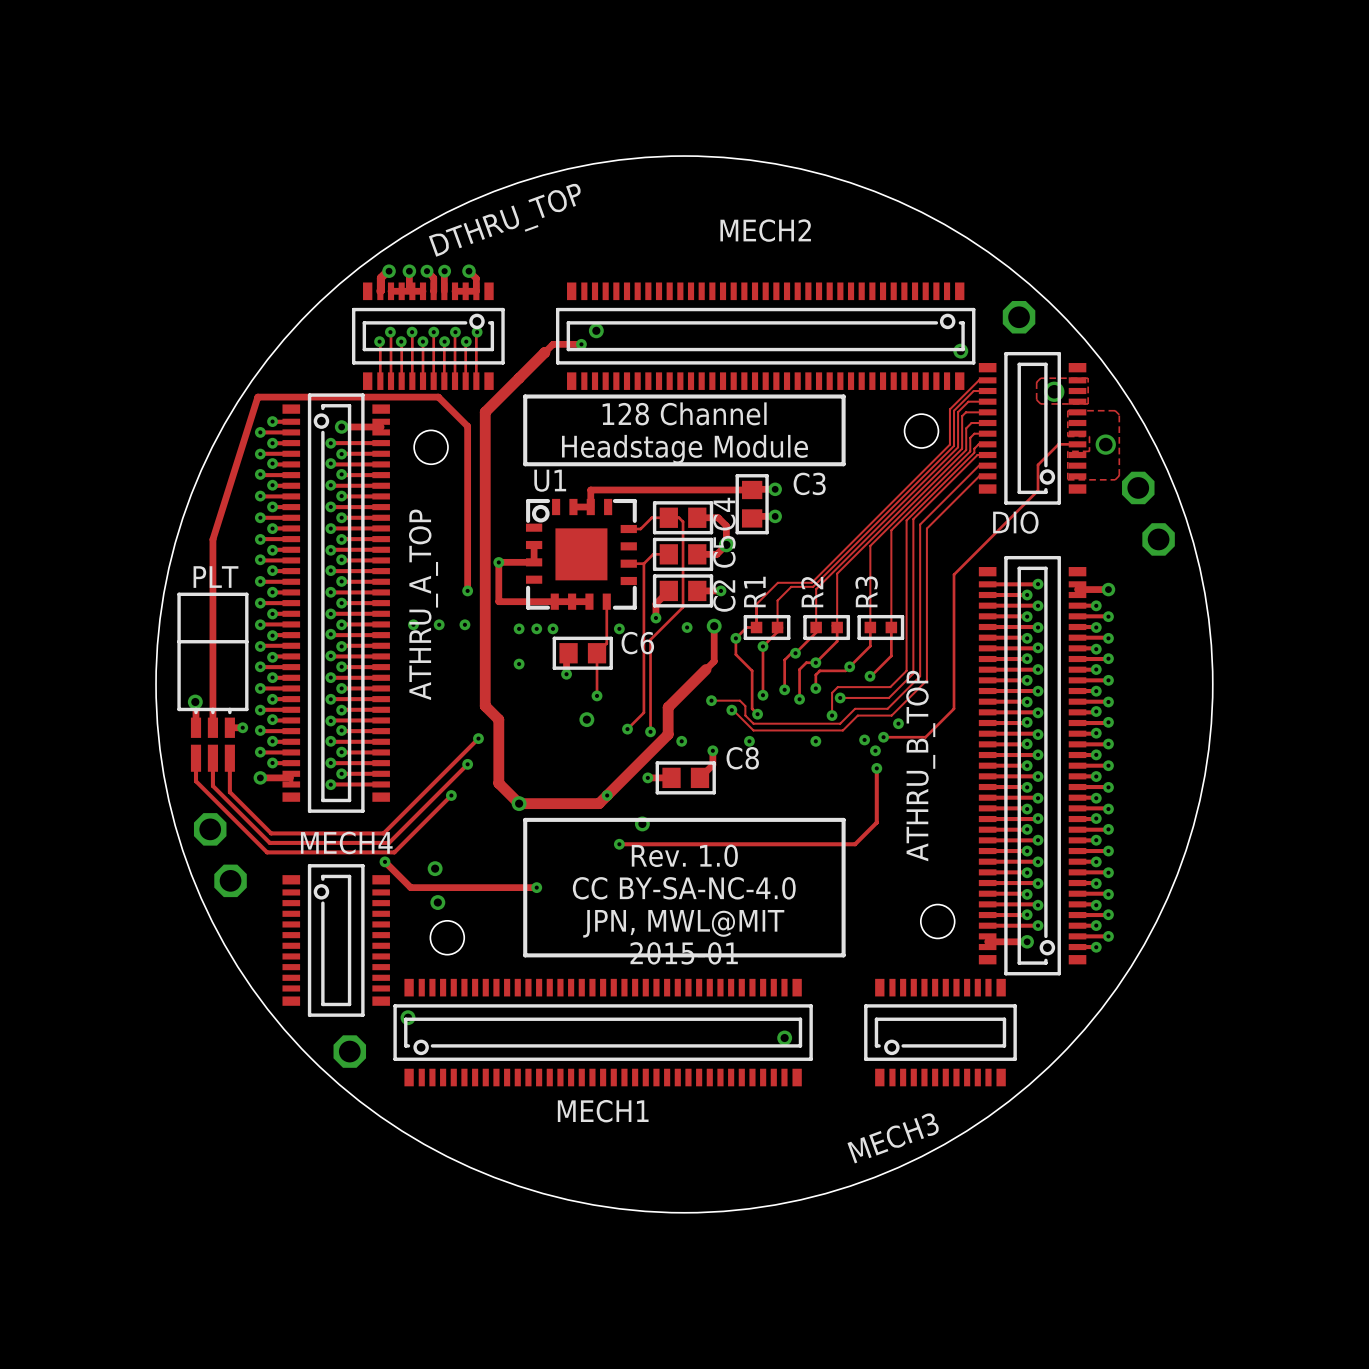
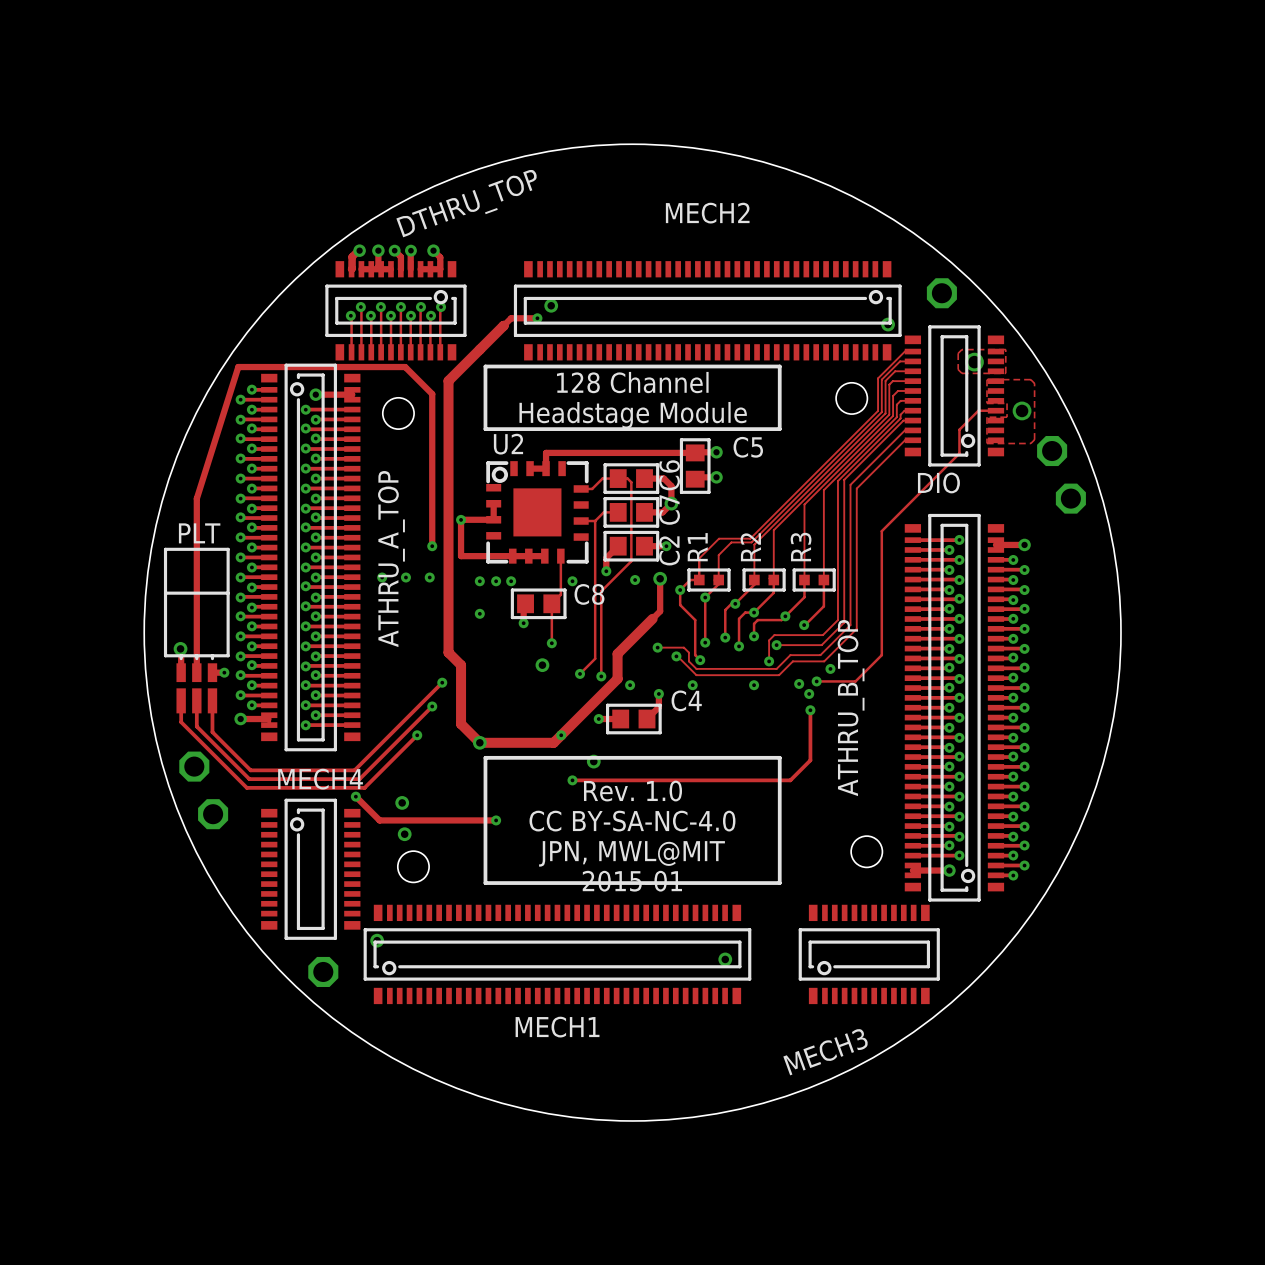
U1 name: U1 (550, 480) -> U2 (508, 444)
C3 name: C3 (809, 483) -> C5 (748, 447)
C4 name: C4 (724, 514) -> C6 (669, 475)
C5 name: C5 (724, 551) -> C7 (669, 510)
C6 name: C6 (637, 643) -> C8 (589, 594)
C8 name: C8 (742, 758) -> C4 (686, 700)

